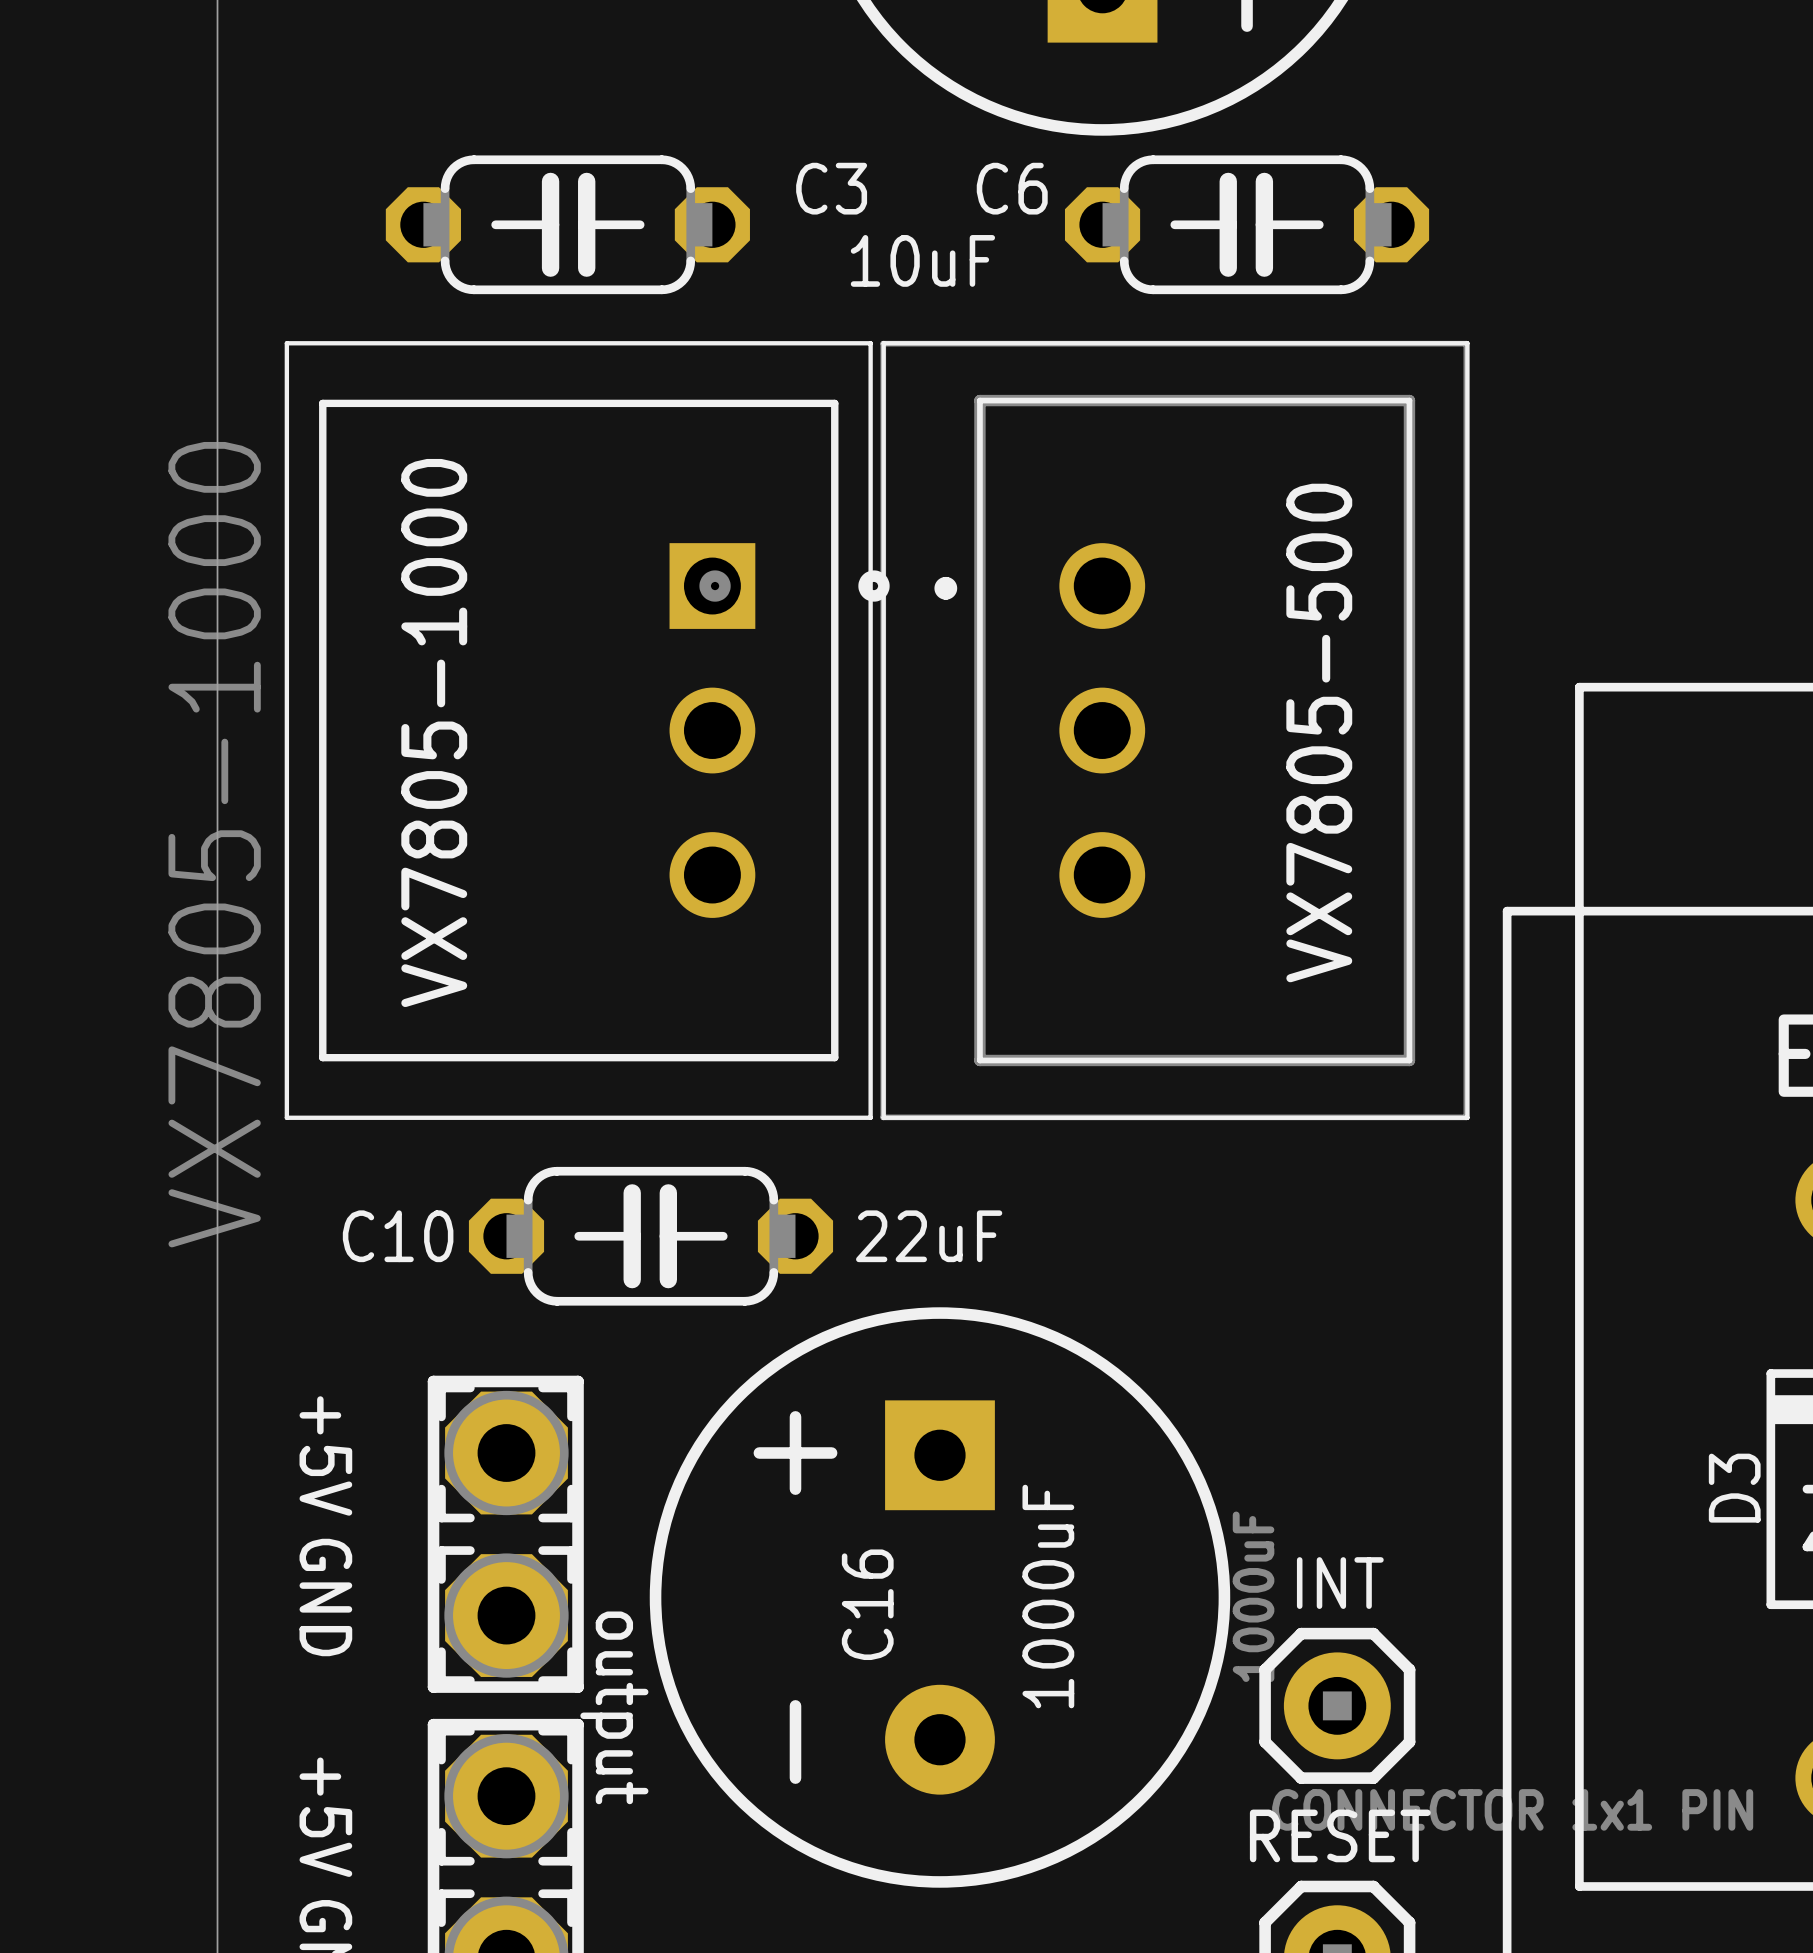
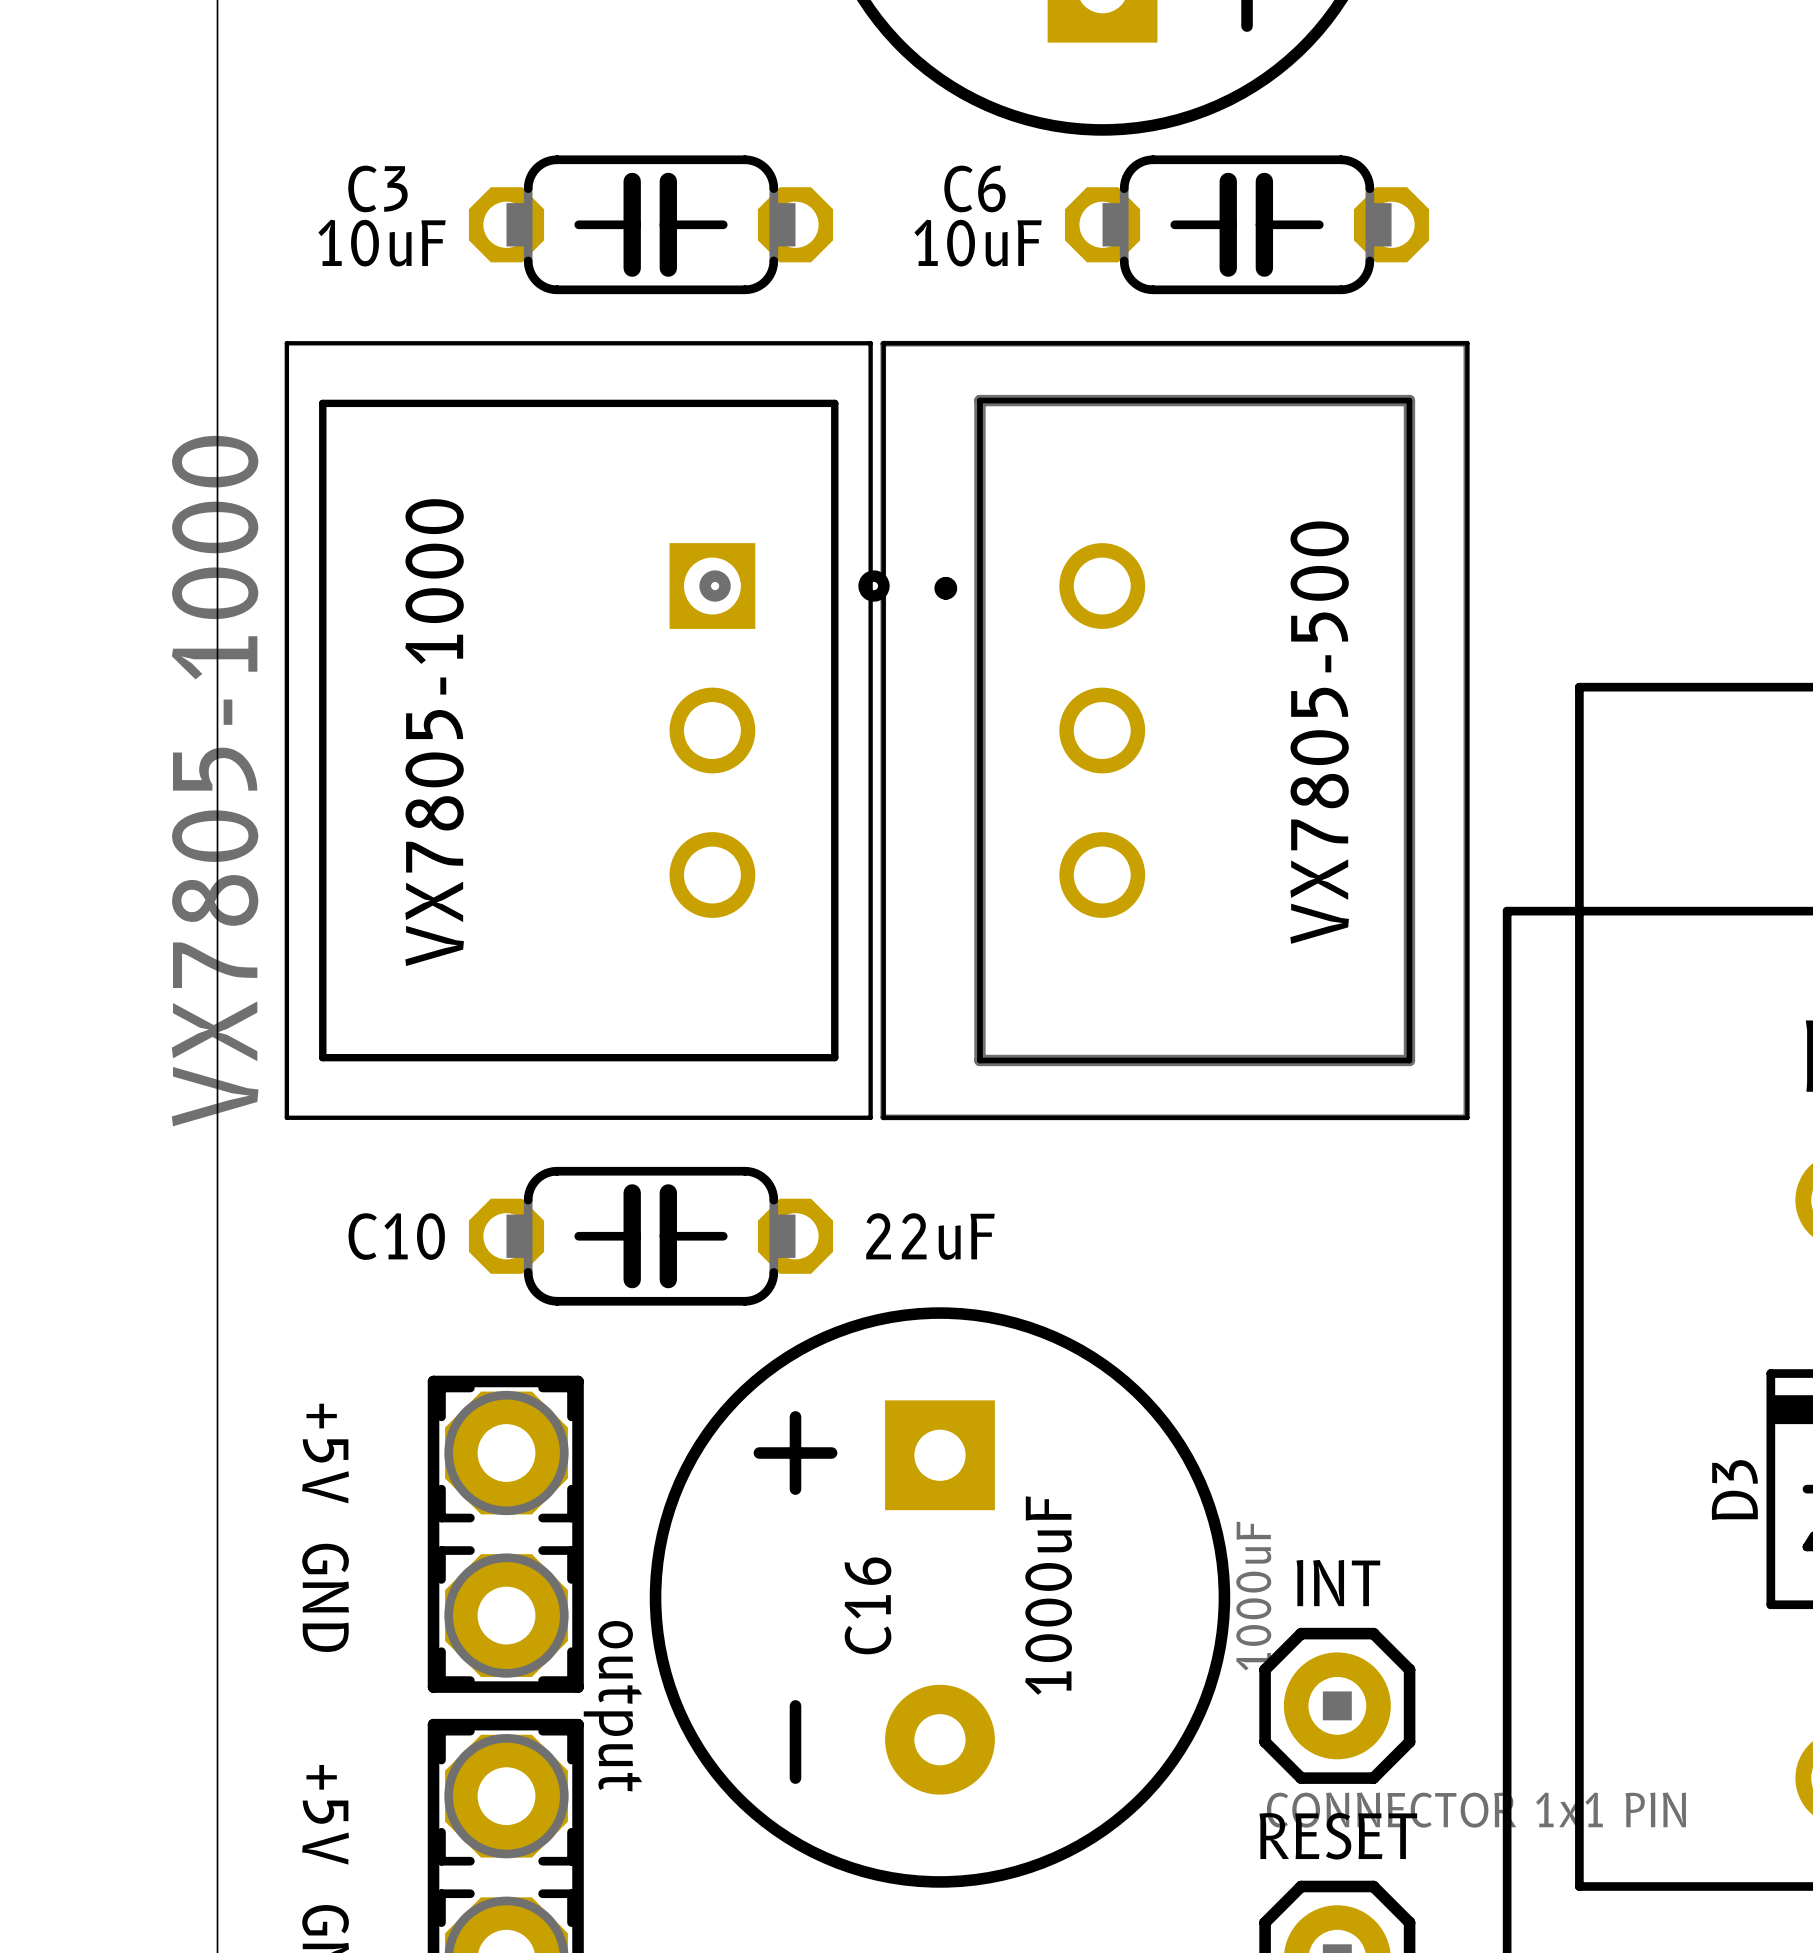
C6 name position: C6 (1012, 188) -> C6 (974, 188)
C3 rotation: 0° (567, 224) -> 180° (650, 224)
C3 value: none -> 10uF (382, 243)
C6 value position: 10uF (922, 260) -> 10uF (978, 243)

